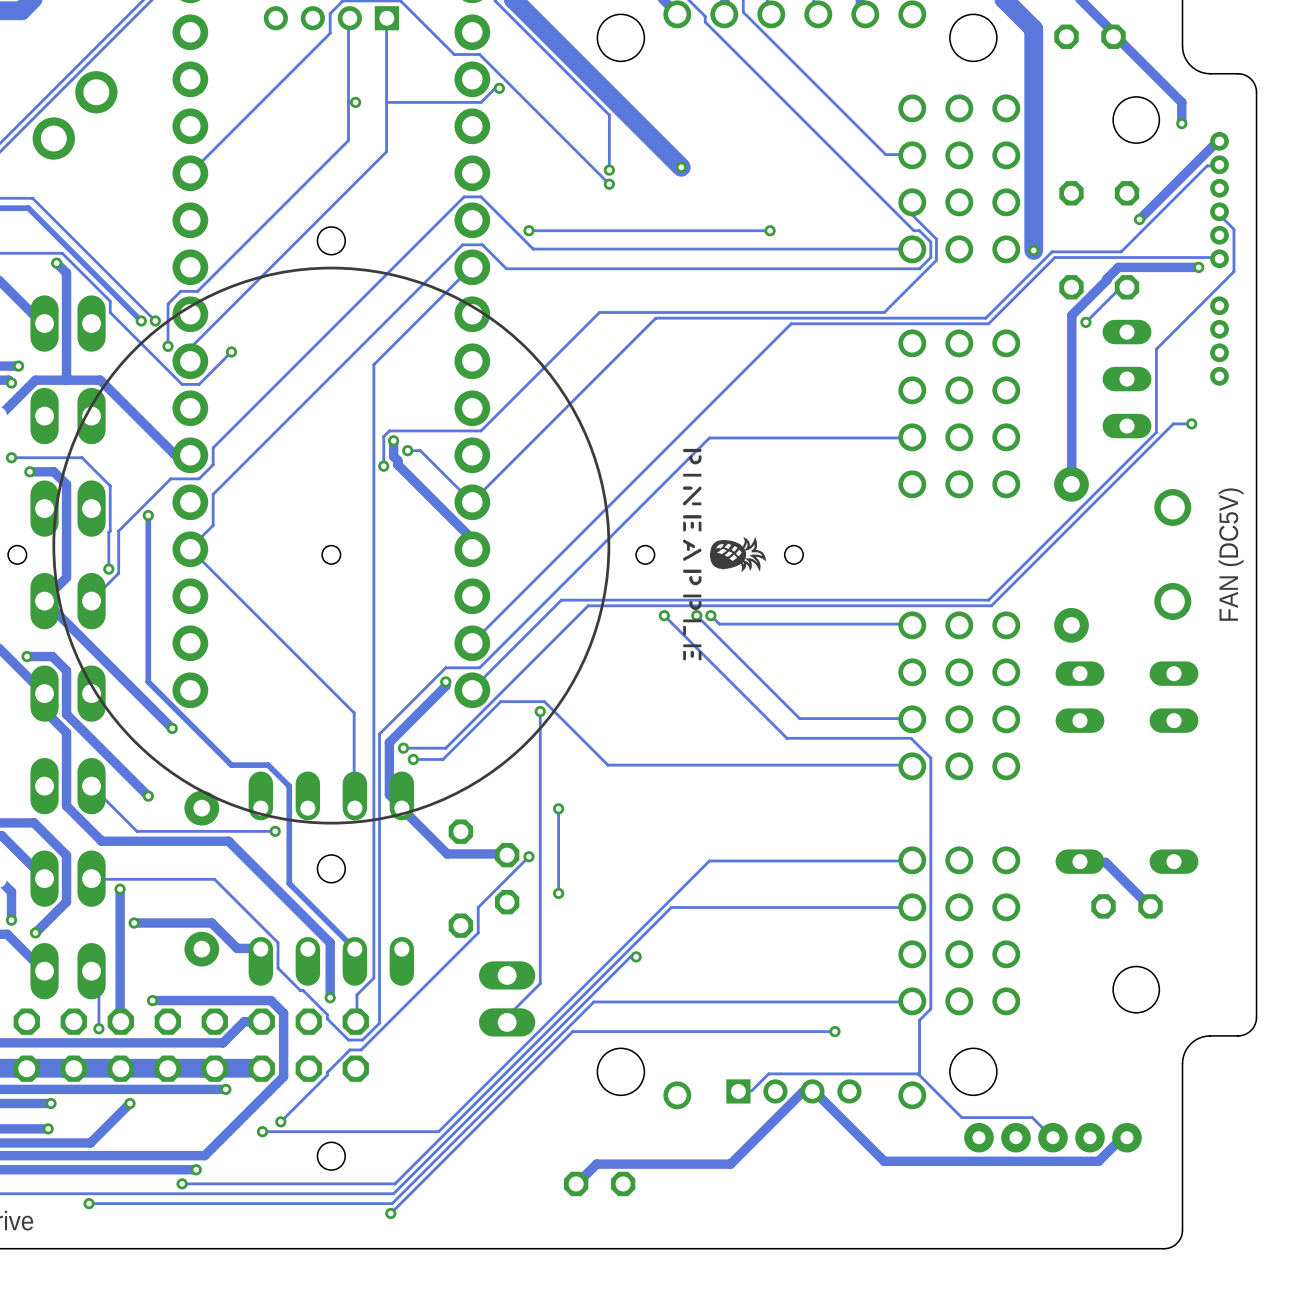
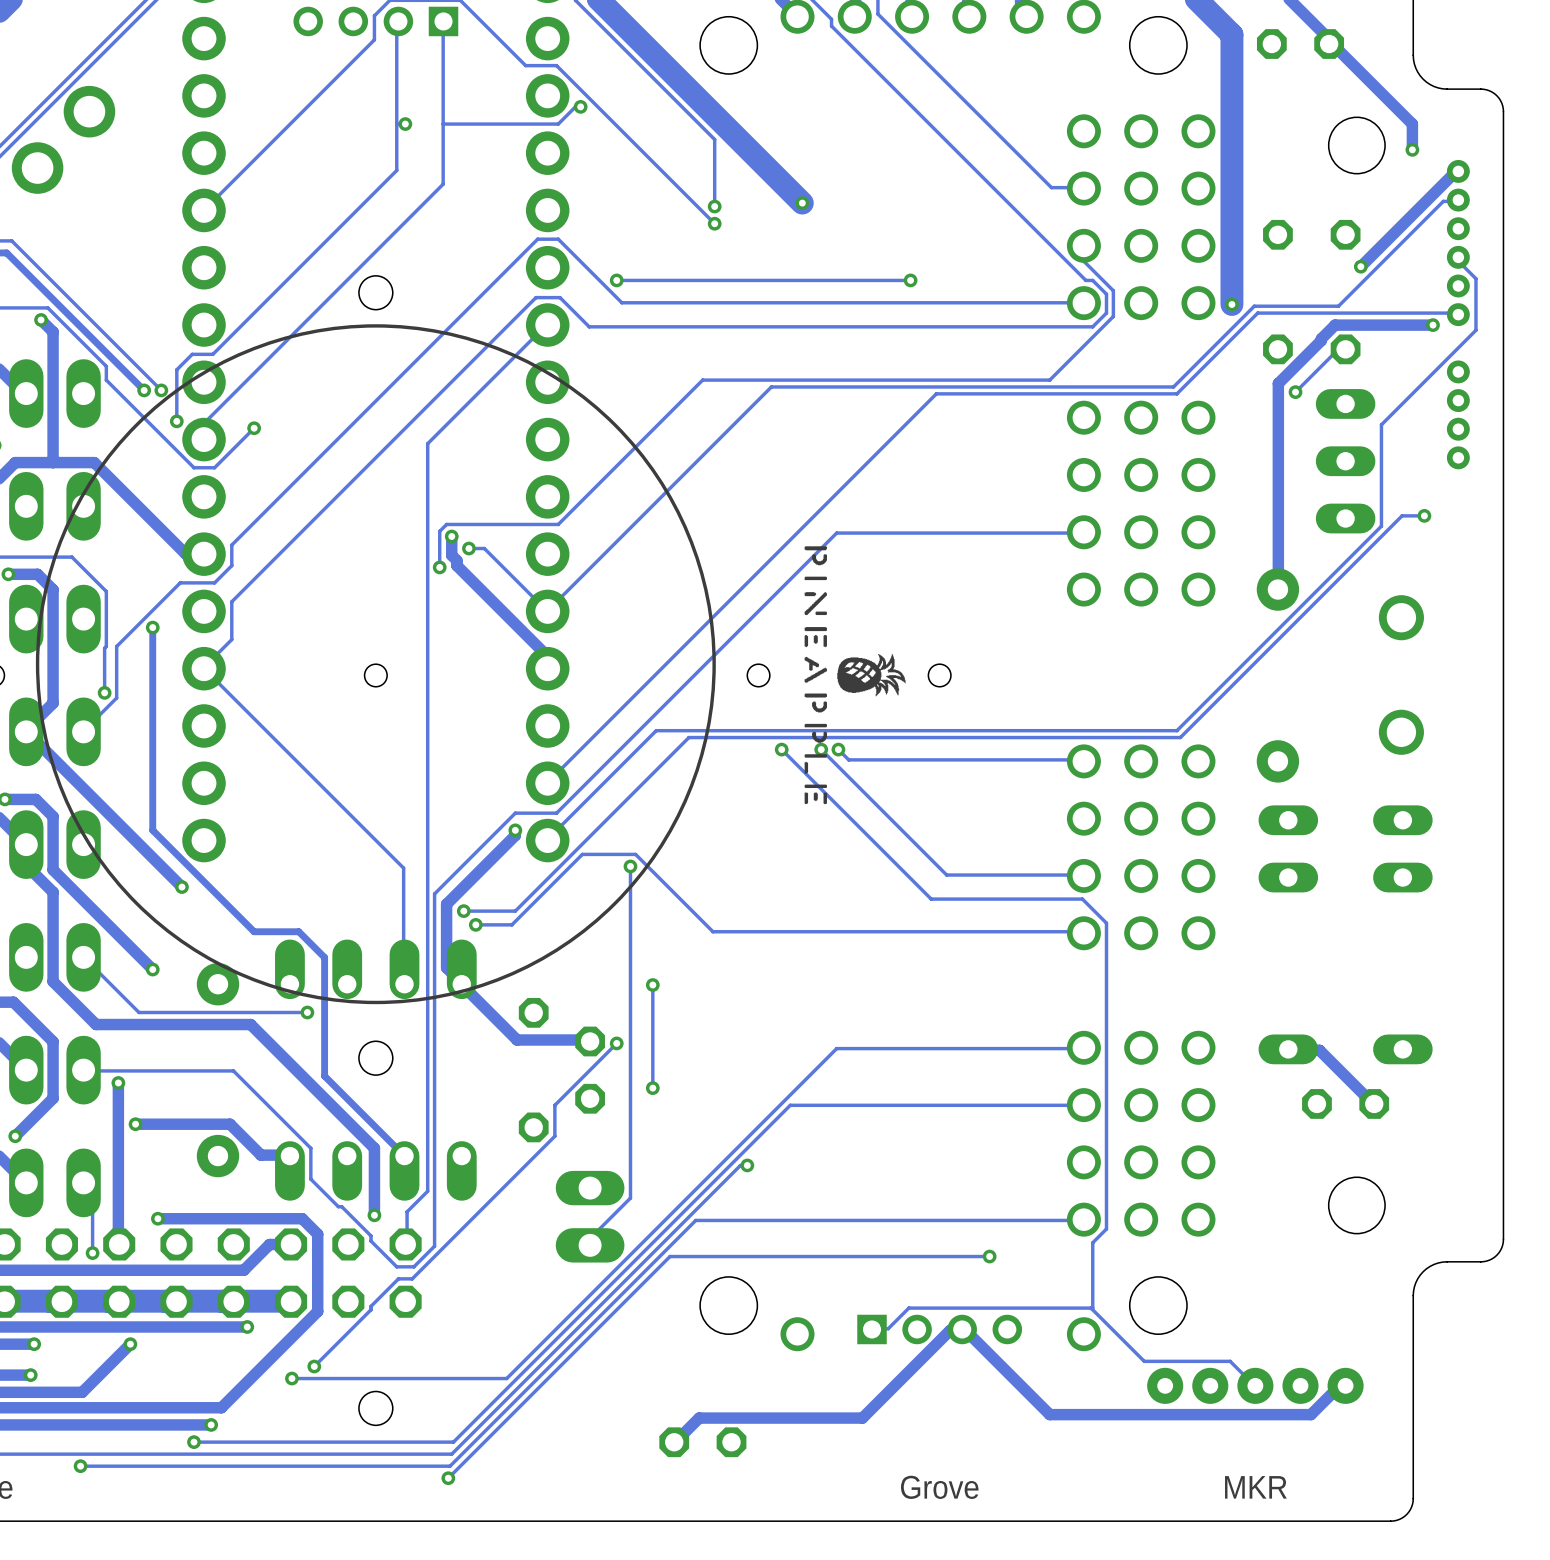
text: FAN (DC5V) (1231, 554) -> none
text: none -> Grove (939, 1487)
text: none -> MKR (1255, 1487)

